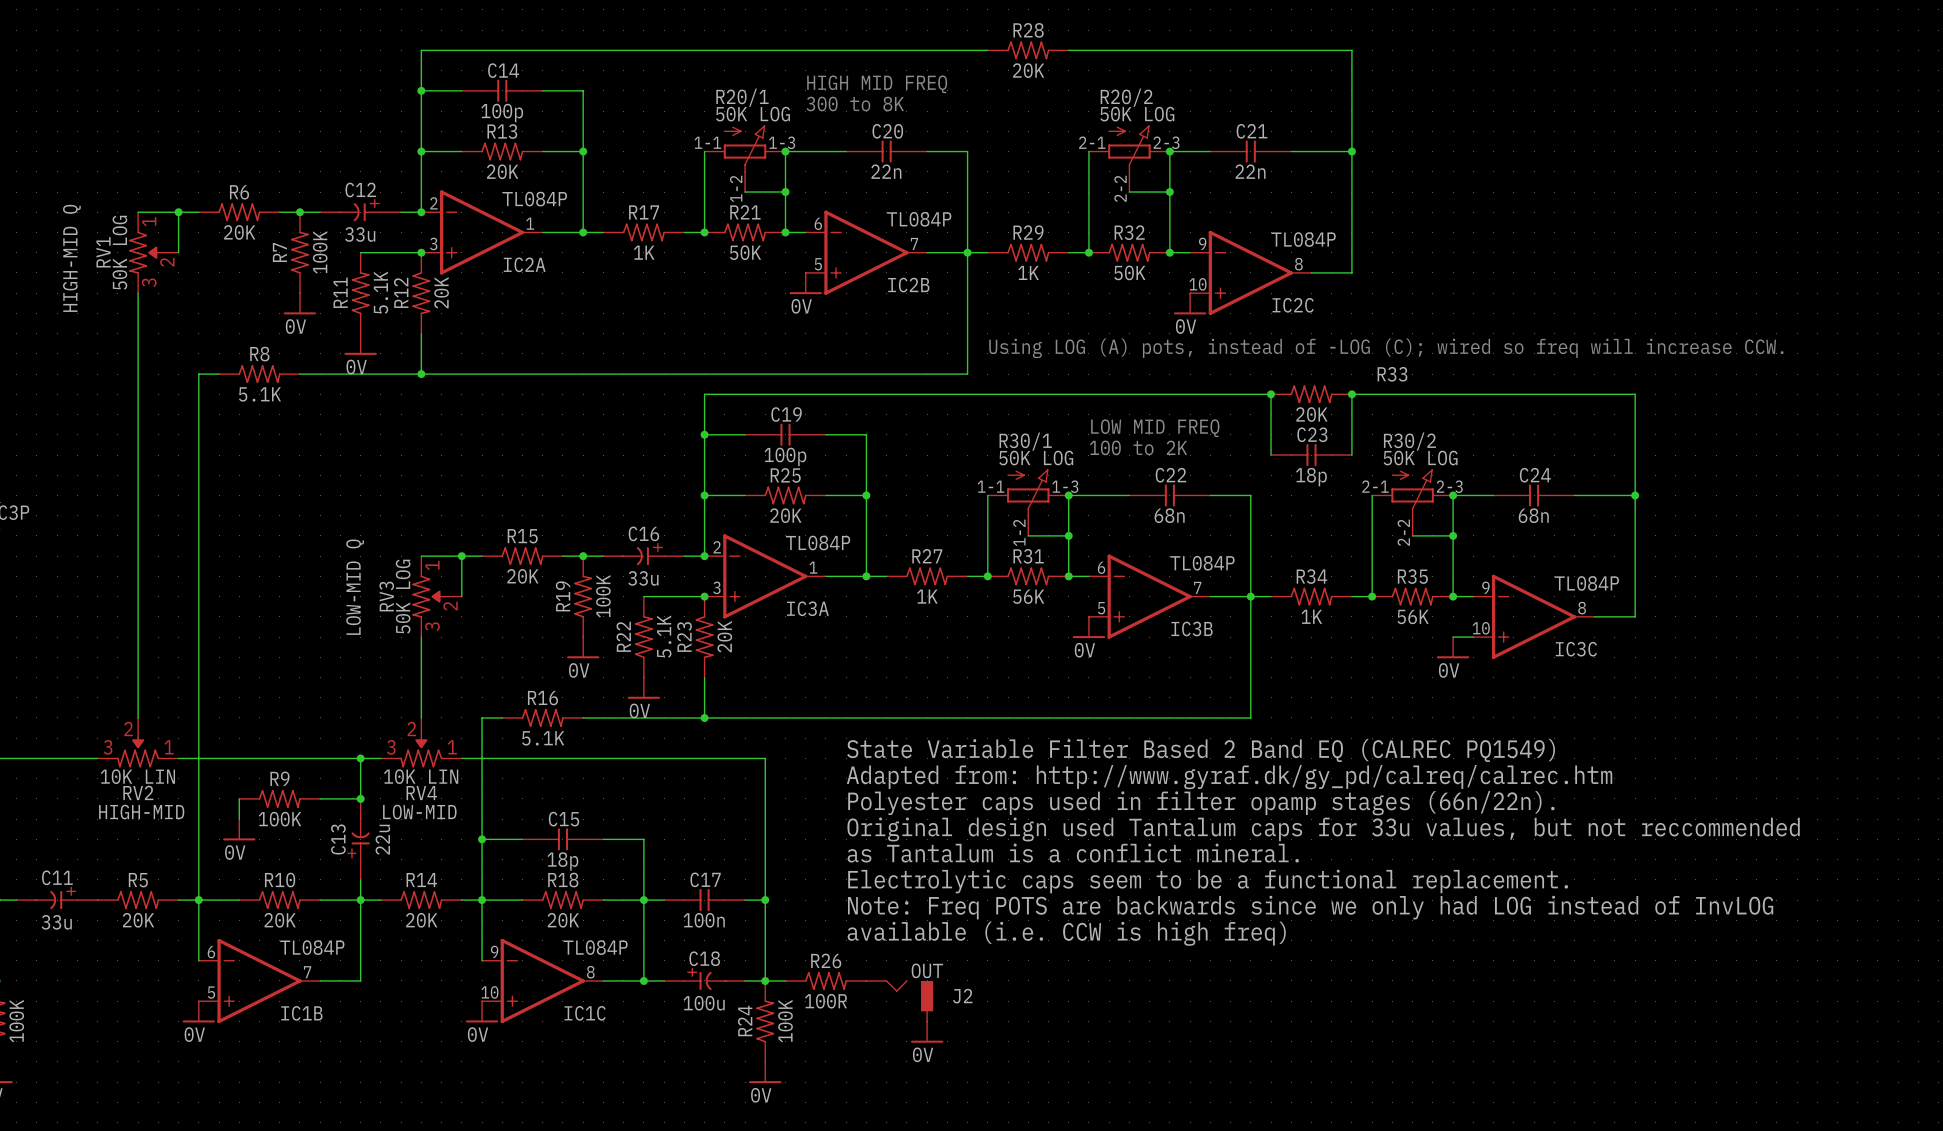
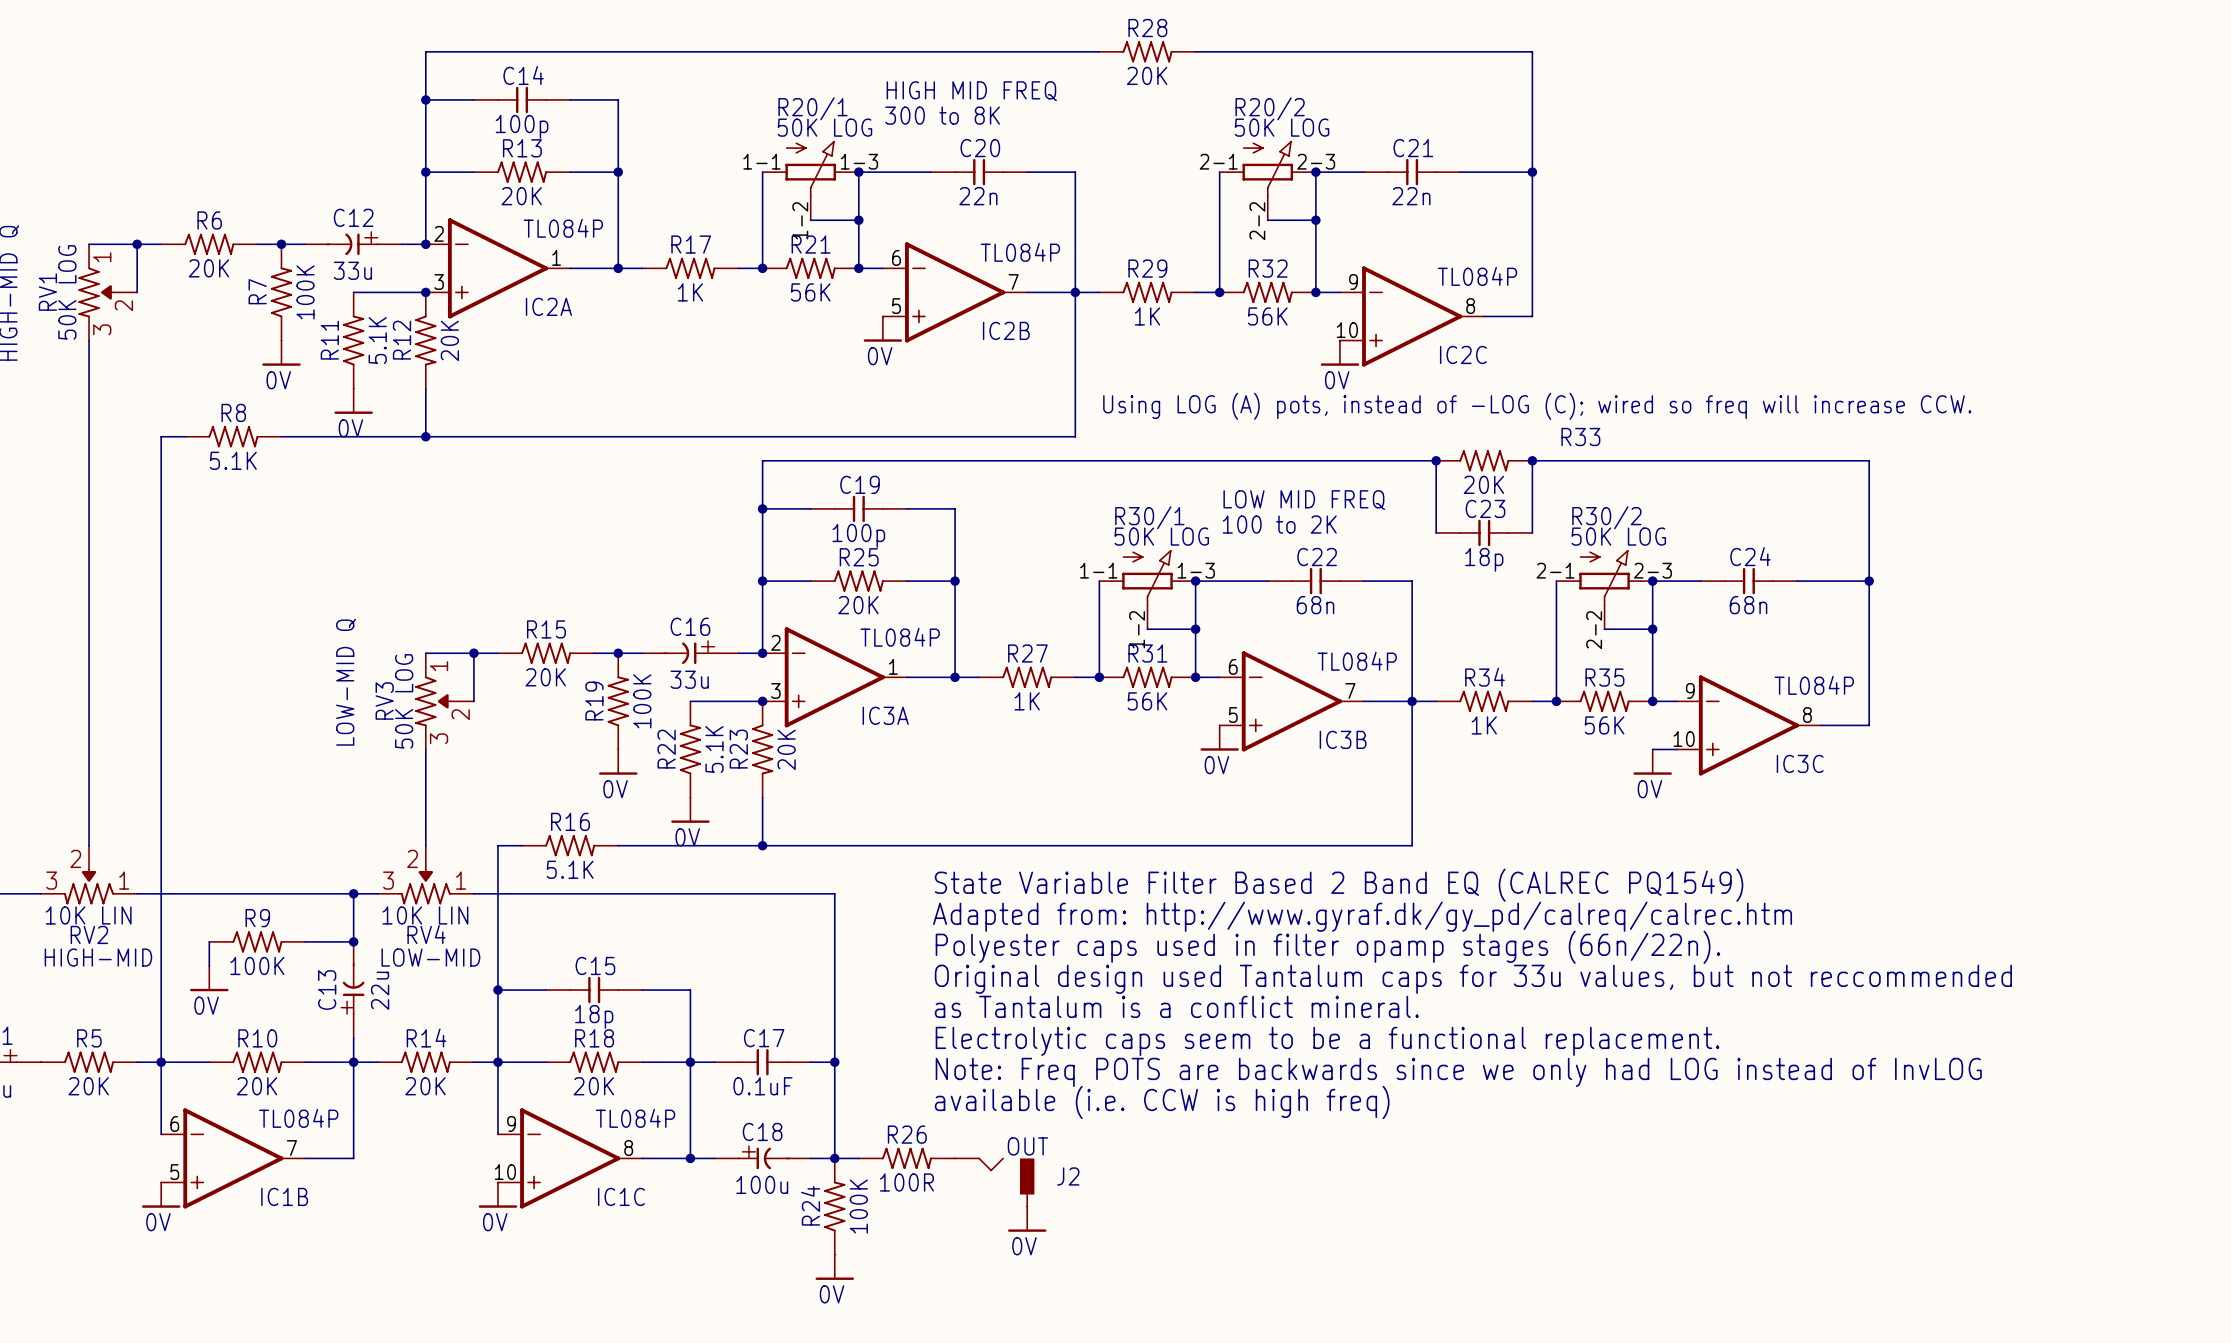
R21 value: 50K (745, 252) -> 56K (810, 292)
R32 value: 50K (1129, 272) -> 56K (1267, 316)
C17 value: 100n (704, 920) -> 0.1uF (762, 1086)

